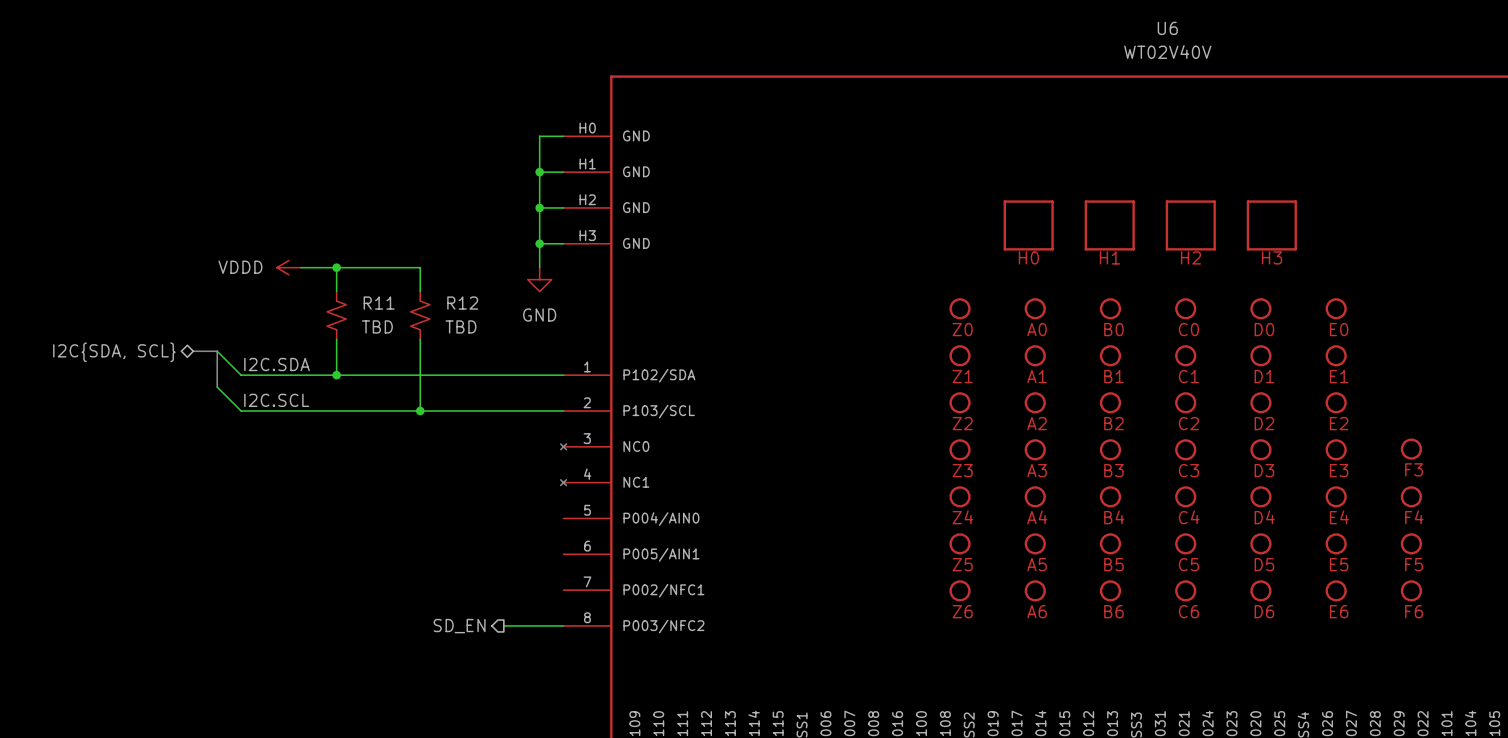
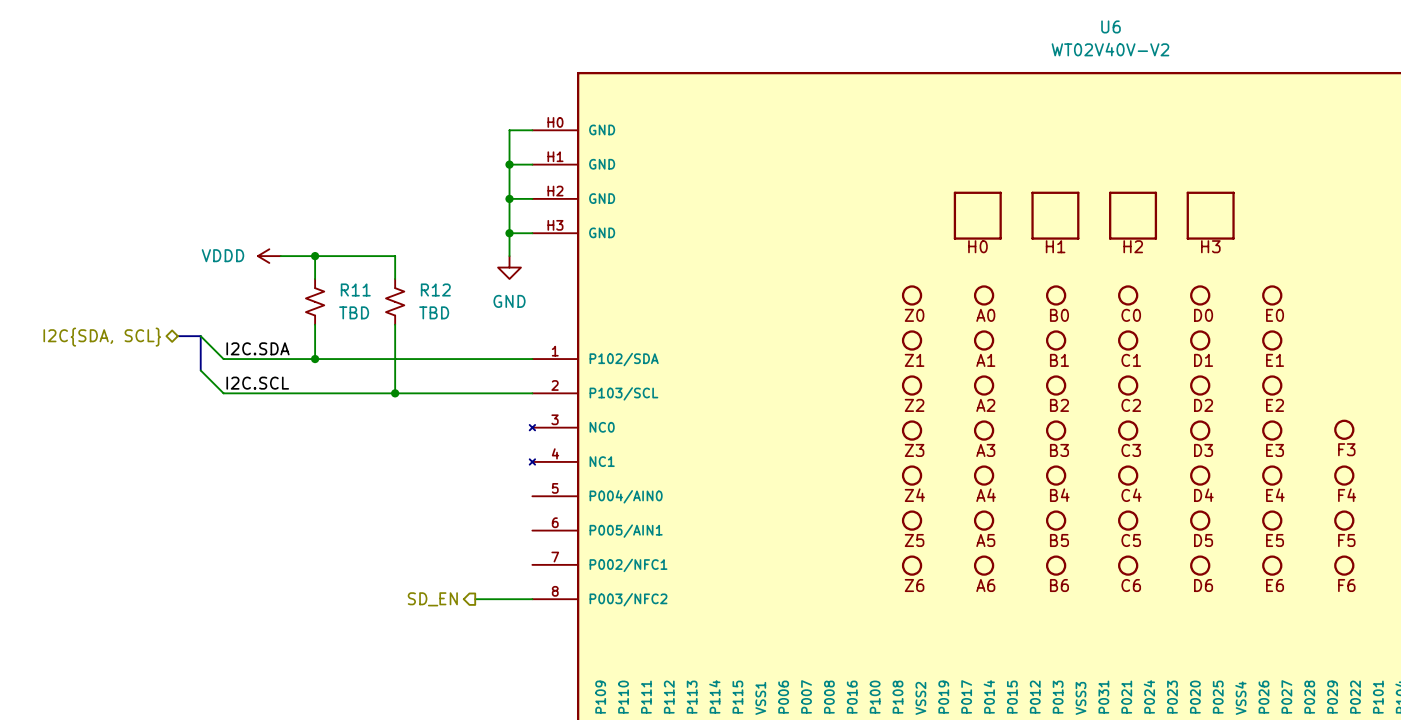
U6 value: WT02V40V (1167, 51) -> WT02V40V-V2 (1110, 49)

